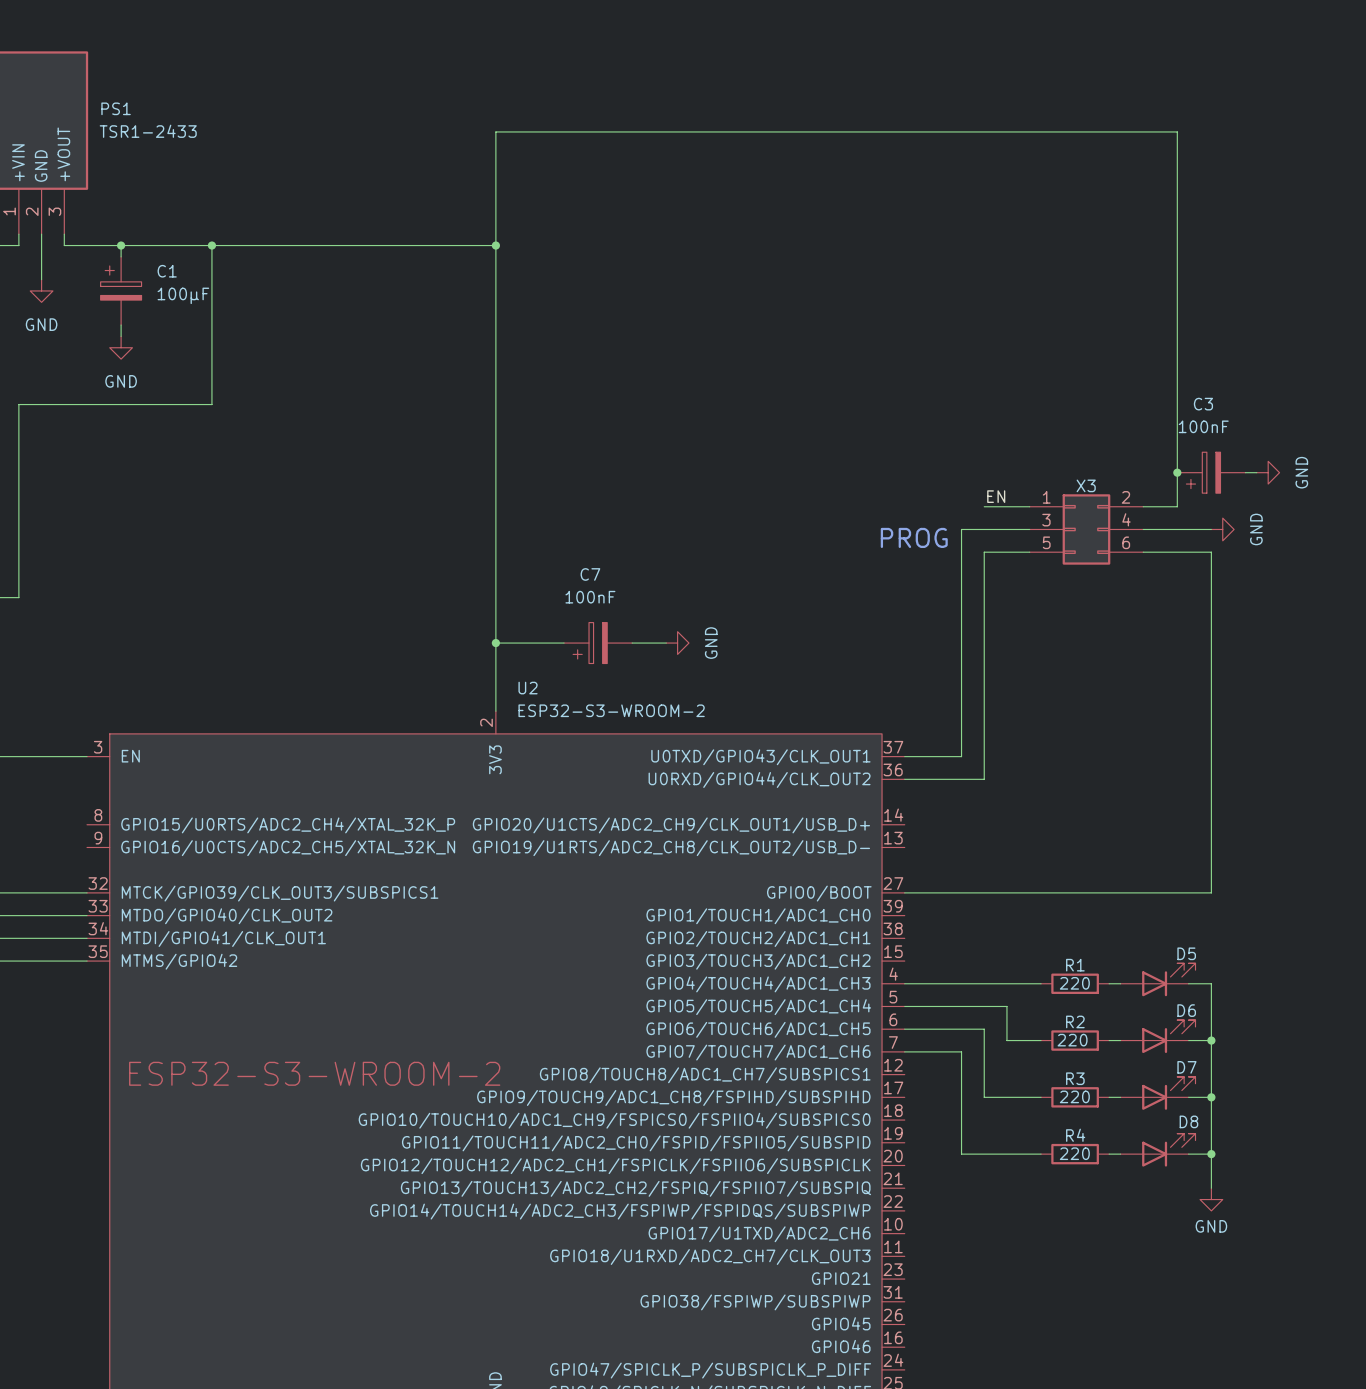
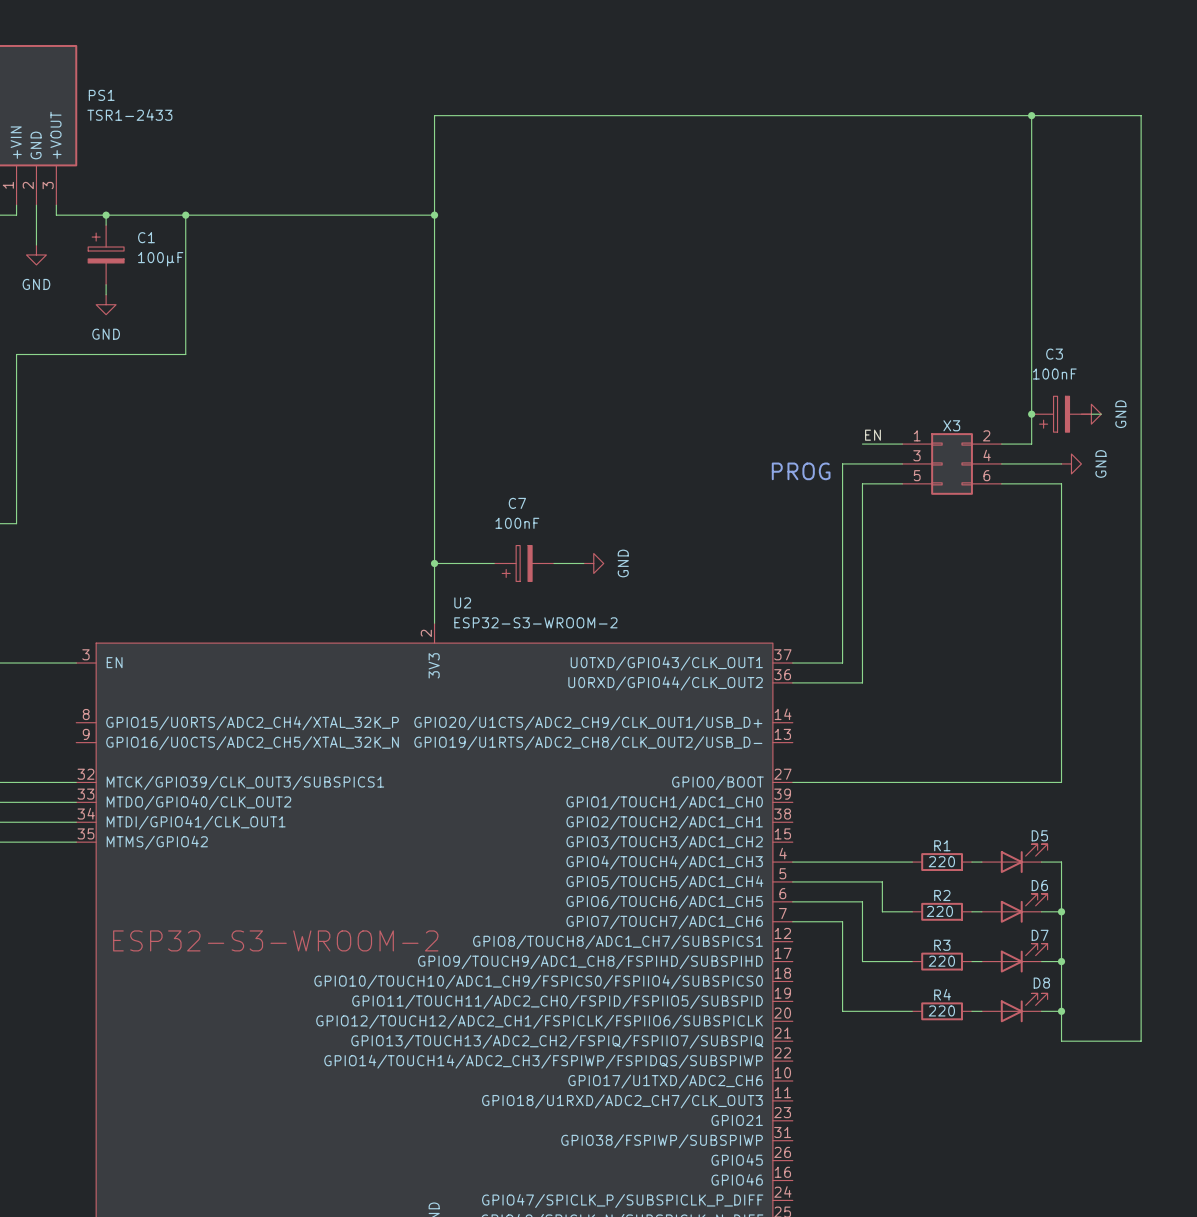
wire: none -> (1031, 115) (1141, 115) (1141, 1041) (1061, 1041)
junction: none -> (1031, 115)
power symbol position: GND (1268, 472) -> GND (1091, 414)
power symbol: GND (1211, 1199) -> none

